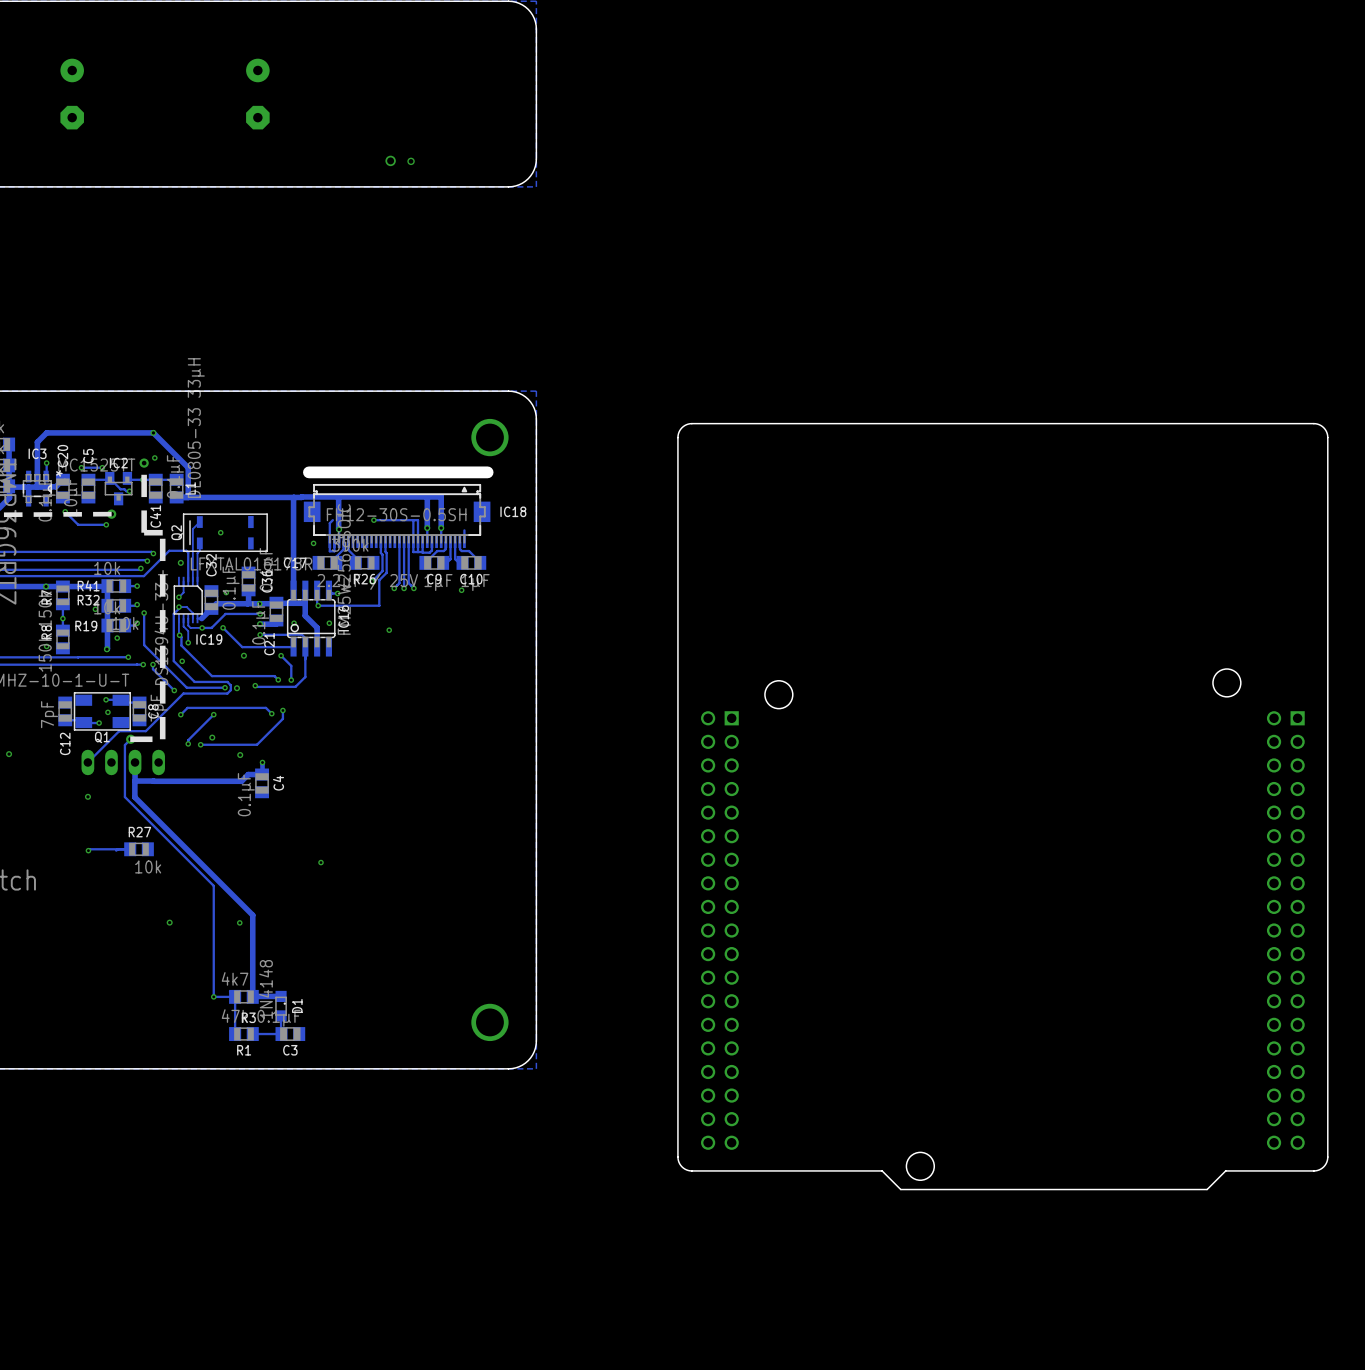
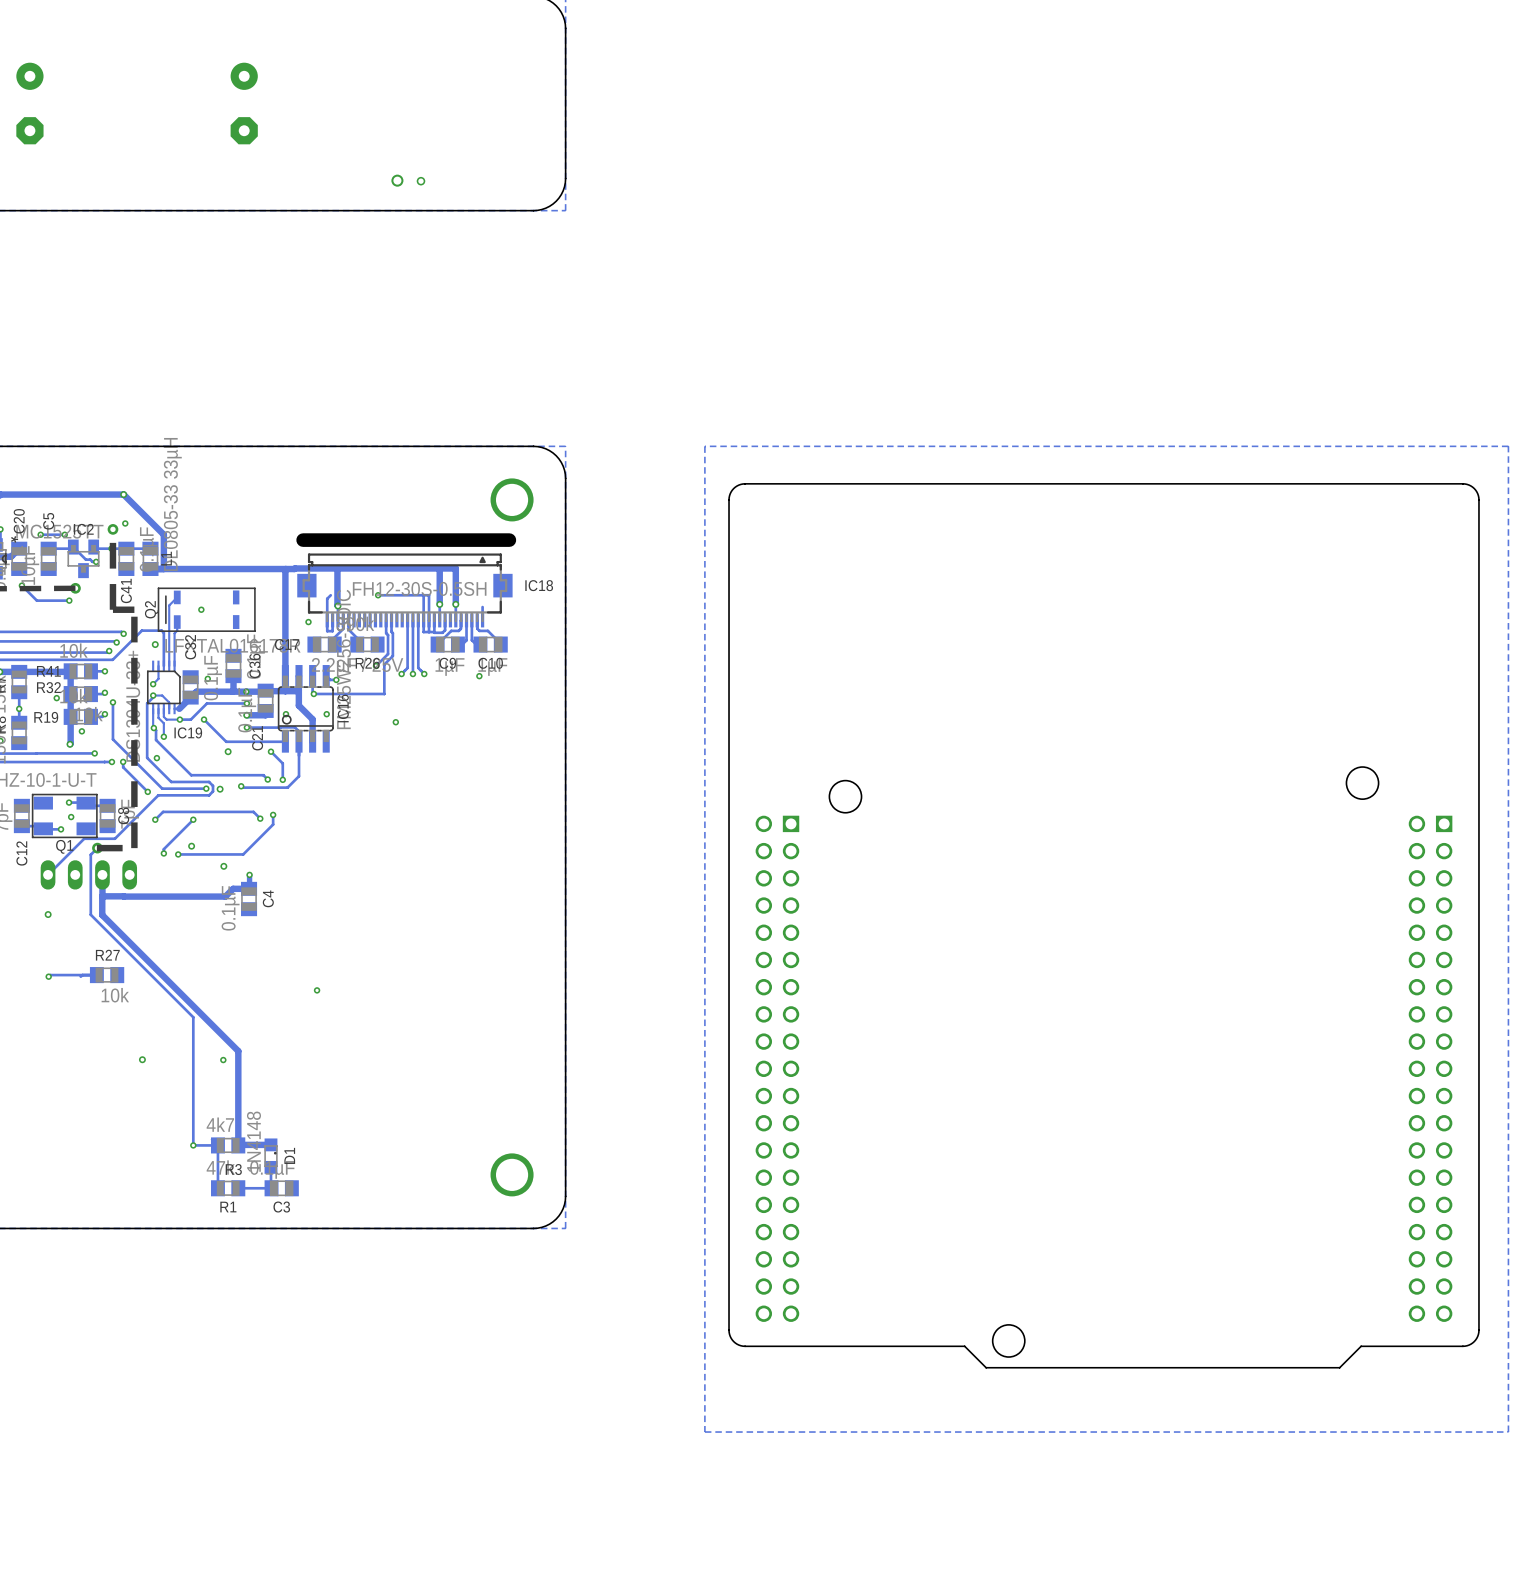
zone outline: none -> (1508, 446) (704, 446) (704, 1432) (1508, 1432) (1508, 446)

